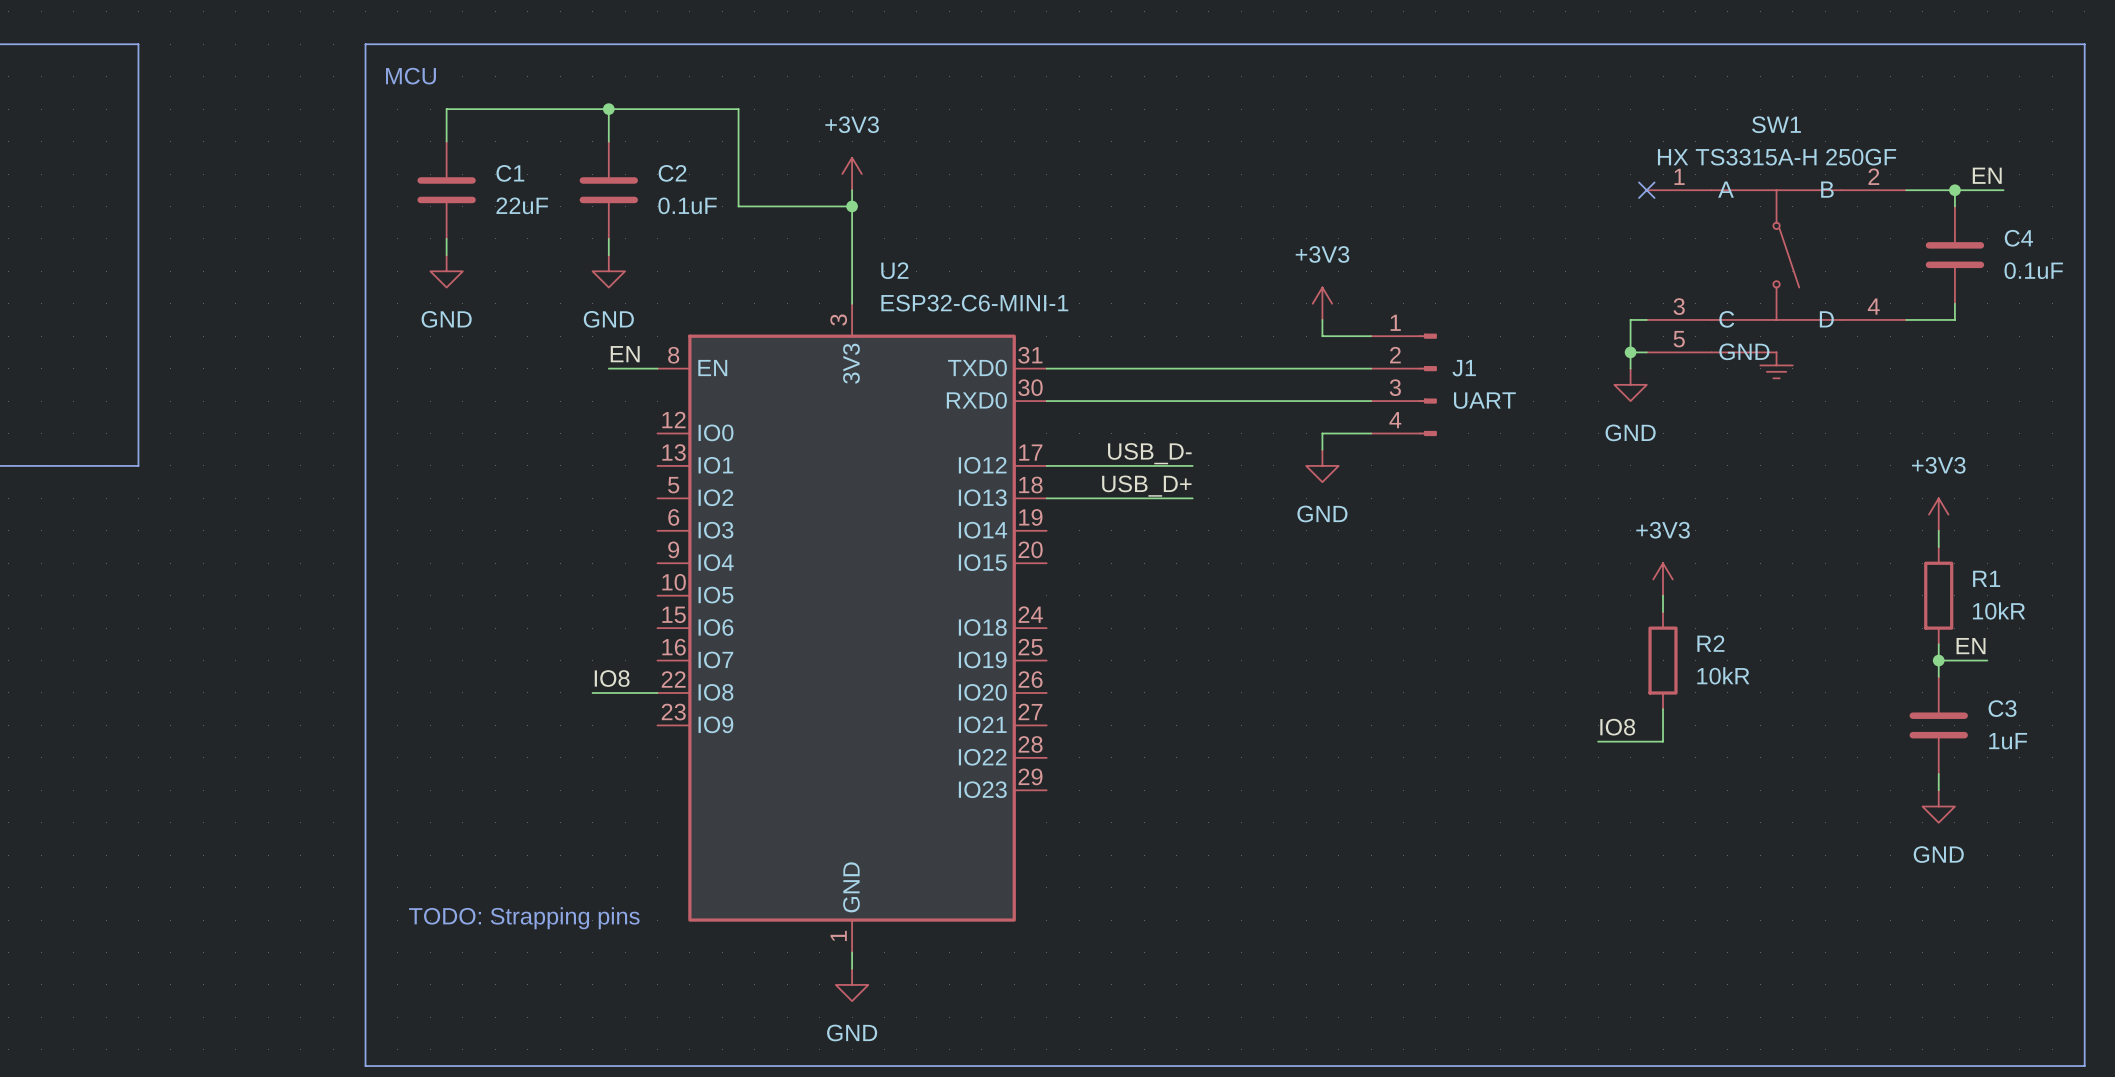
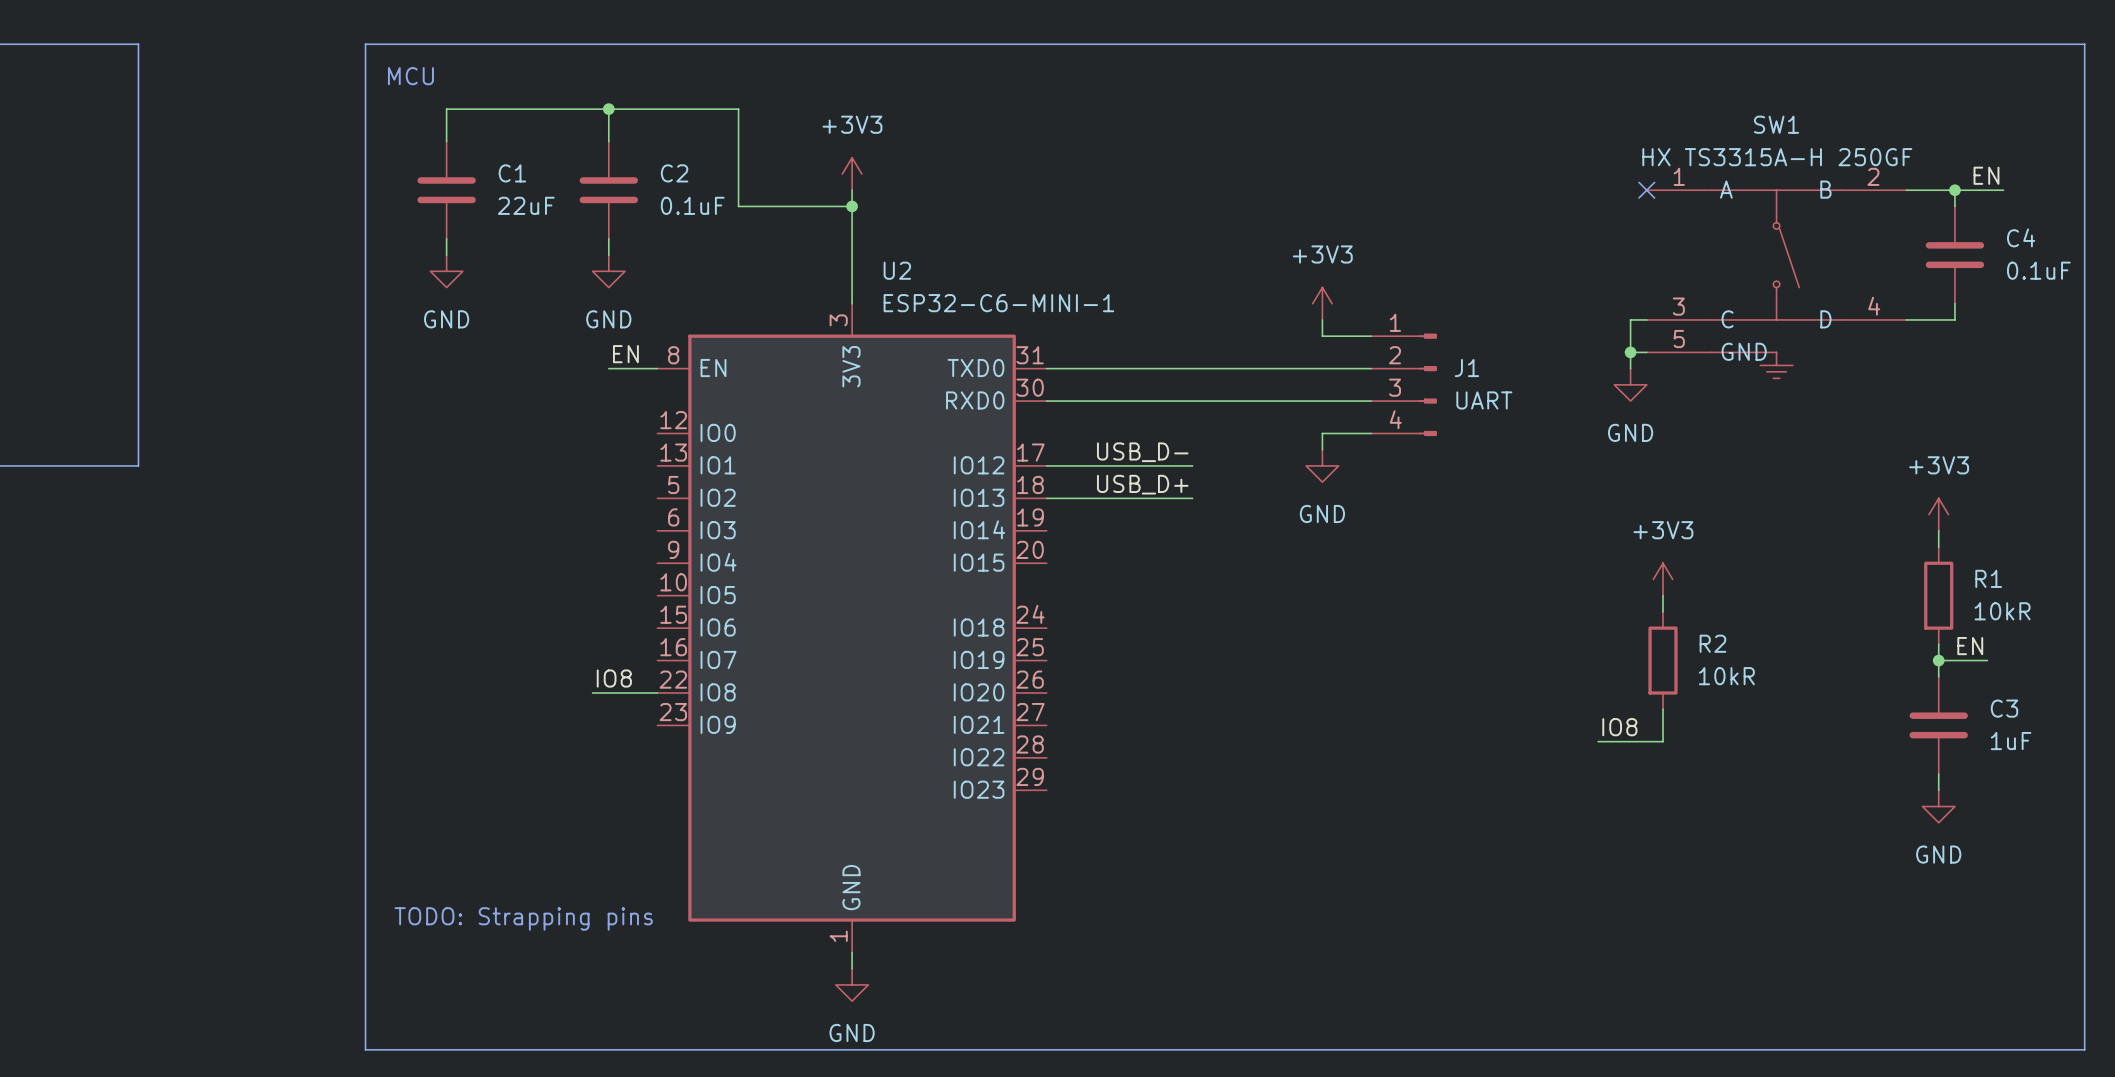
line: (365, 1049) (365, 1066) (2084, 1066) (2084, 1049) -> (365, 1049) (2084, 1049)

